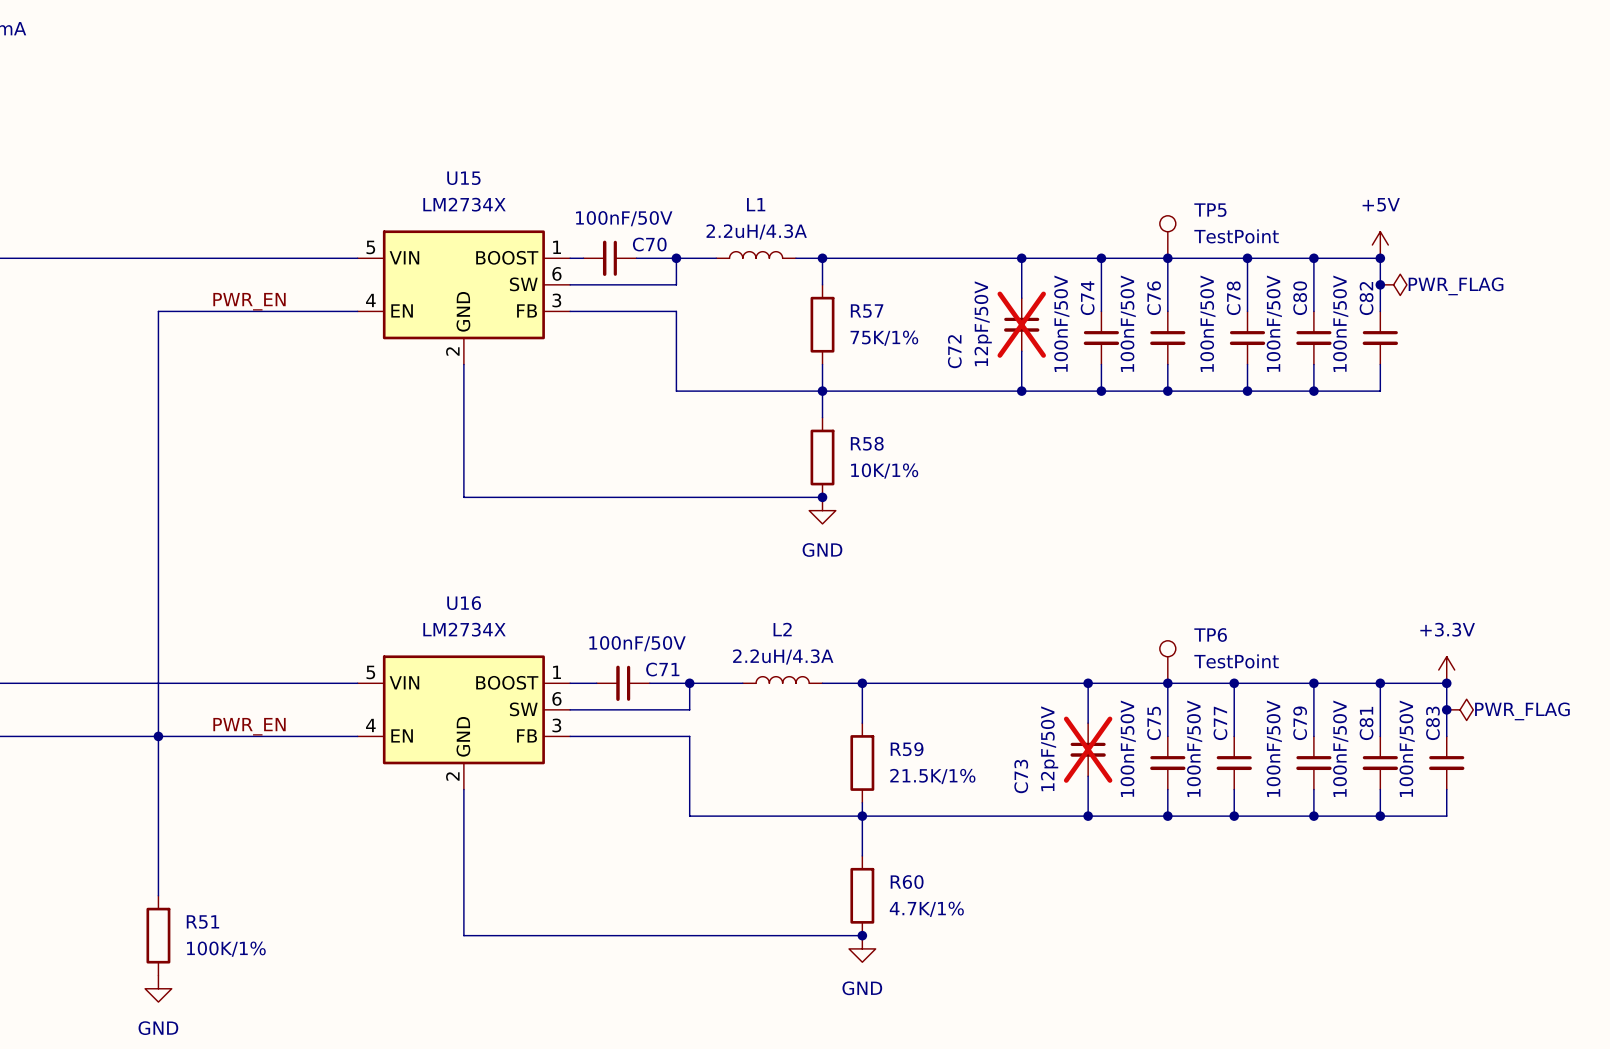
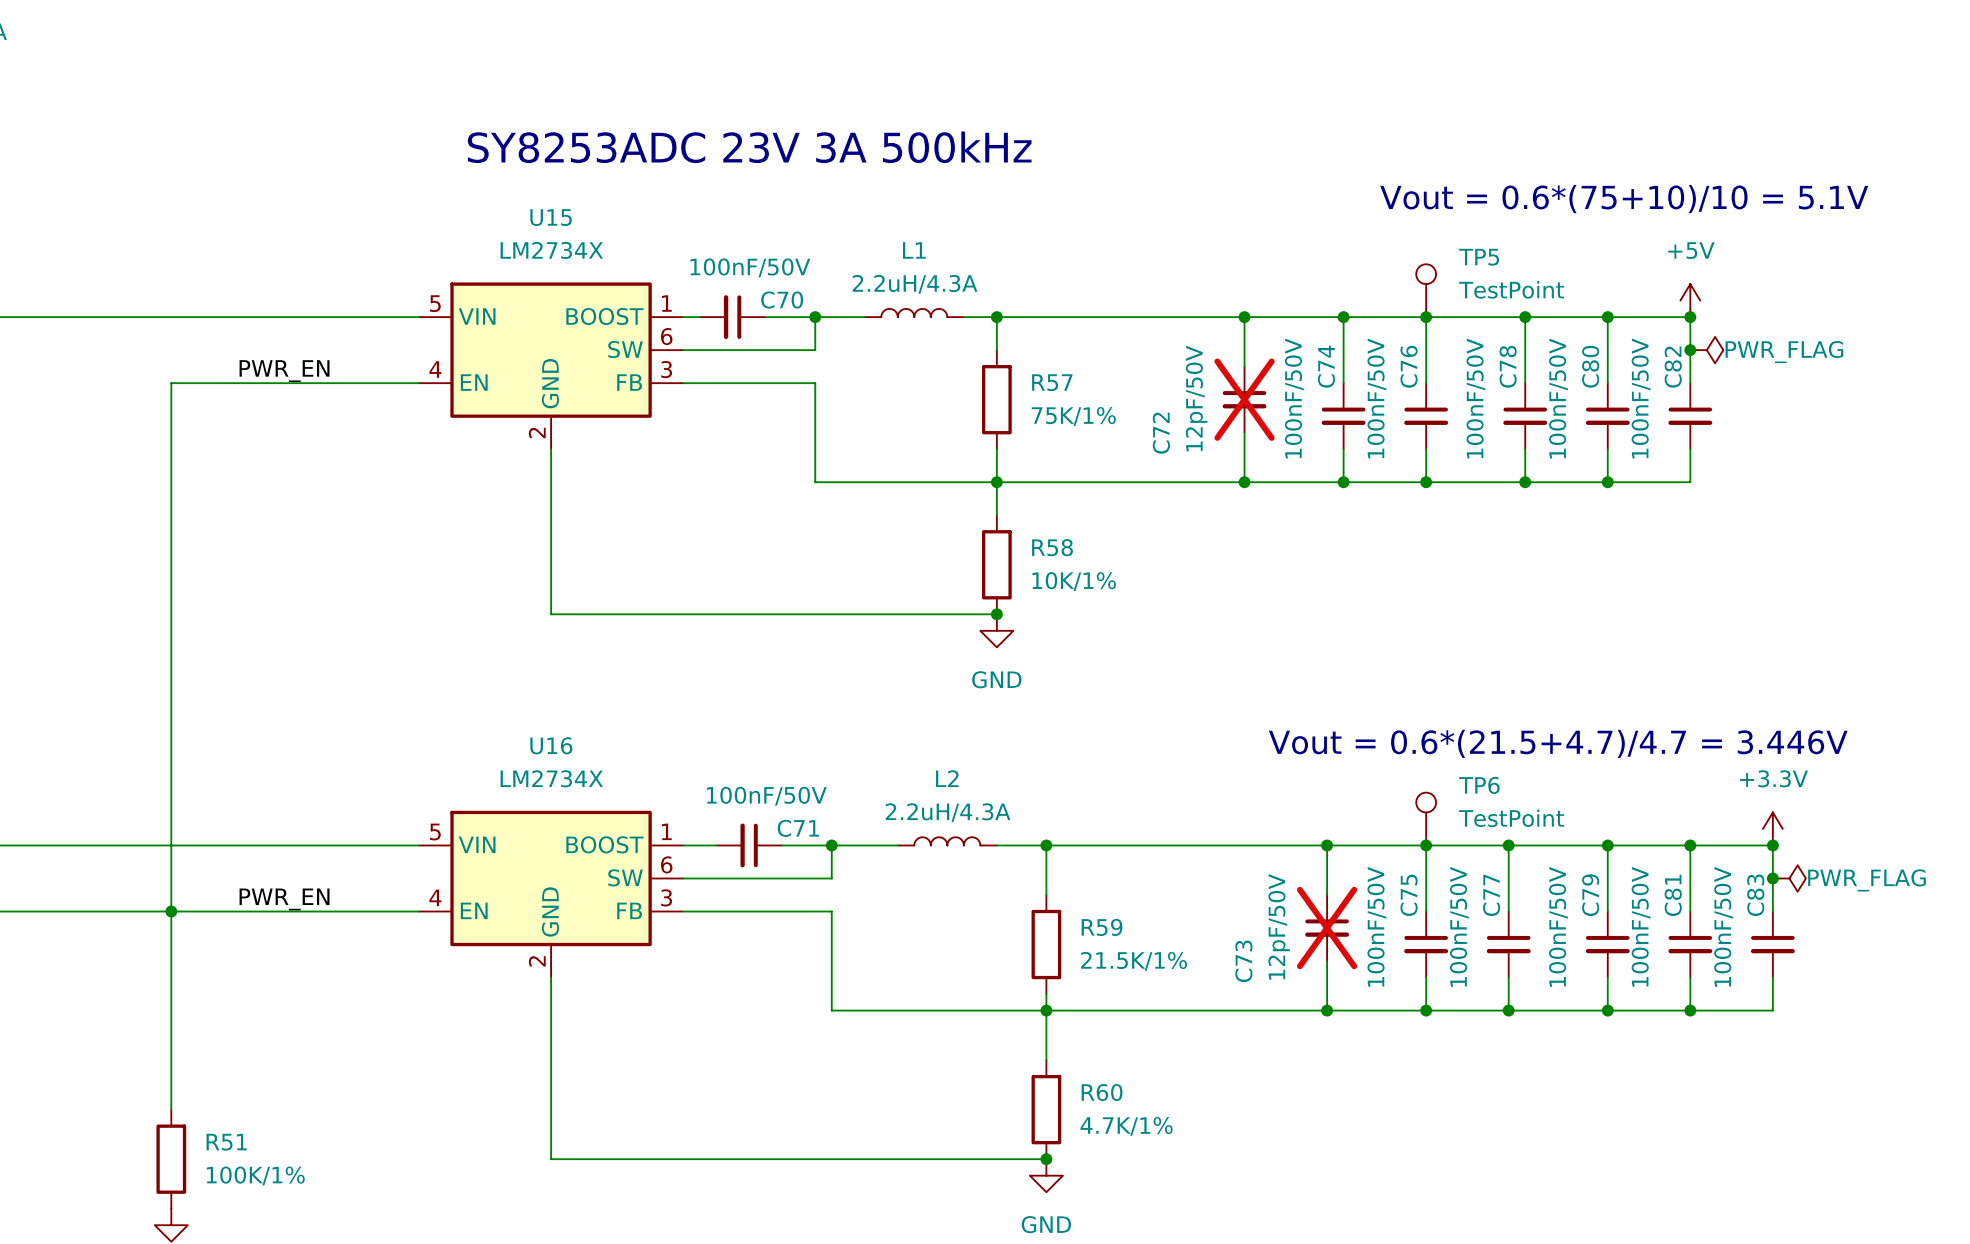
text: none -> SY8253ADC 23V 3A 500kHz (749, 147)
text: none -> Vout = 0.6*(75+10)/10 = 5.1V (1624, 199)
text: none -> Vout = 0.6*(21.5+4.7)/4.7 = 3.446V (1558, 743)

